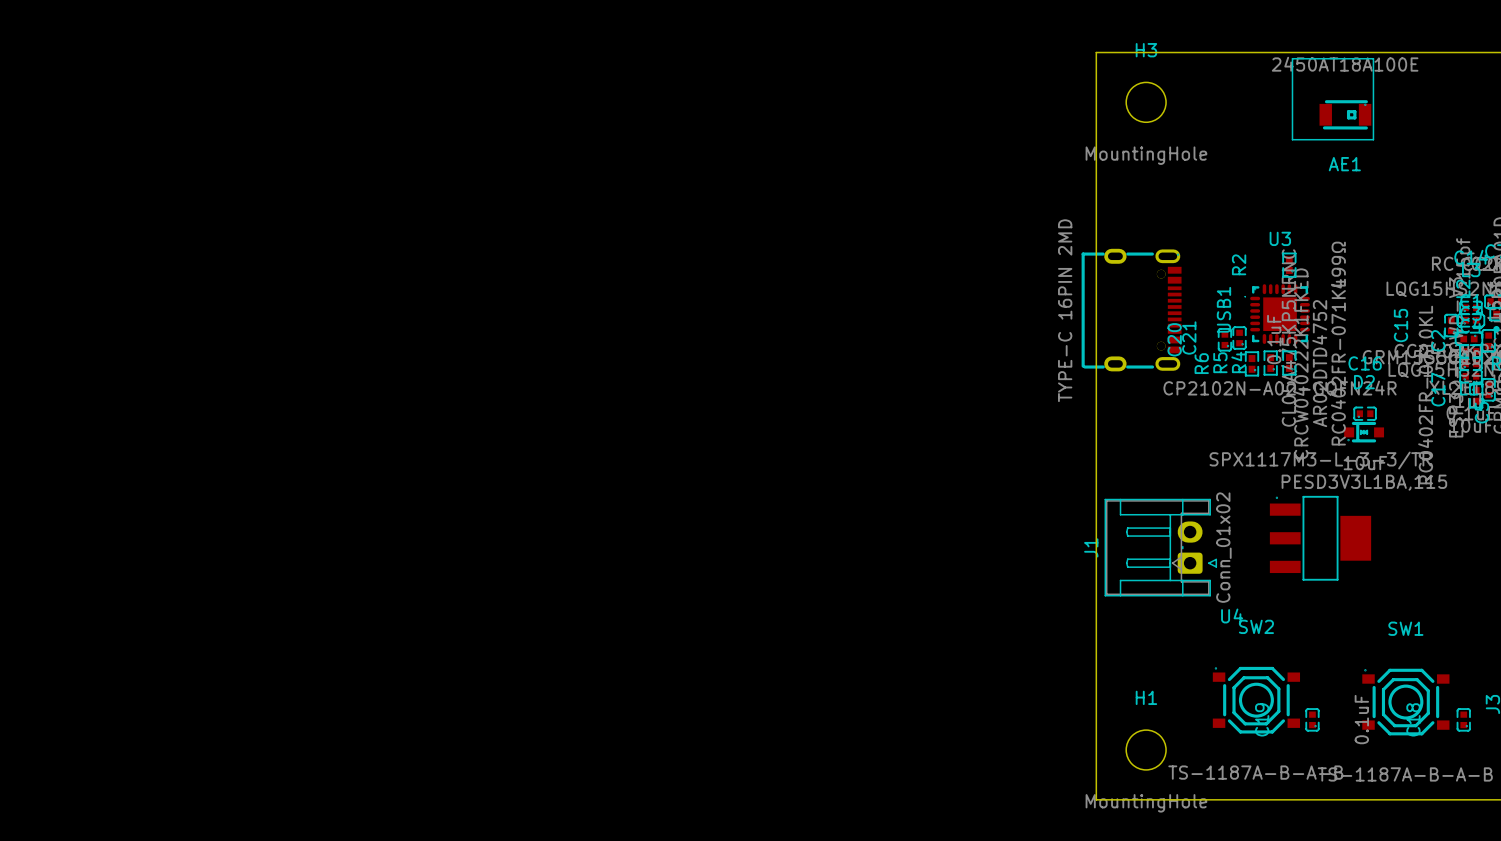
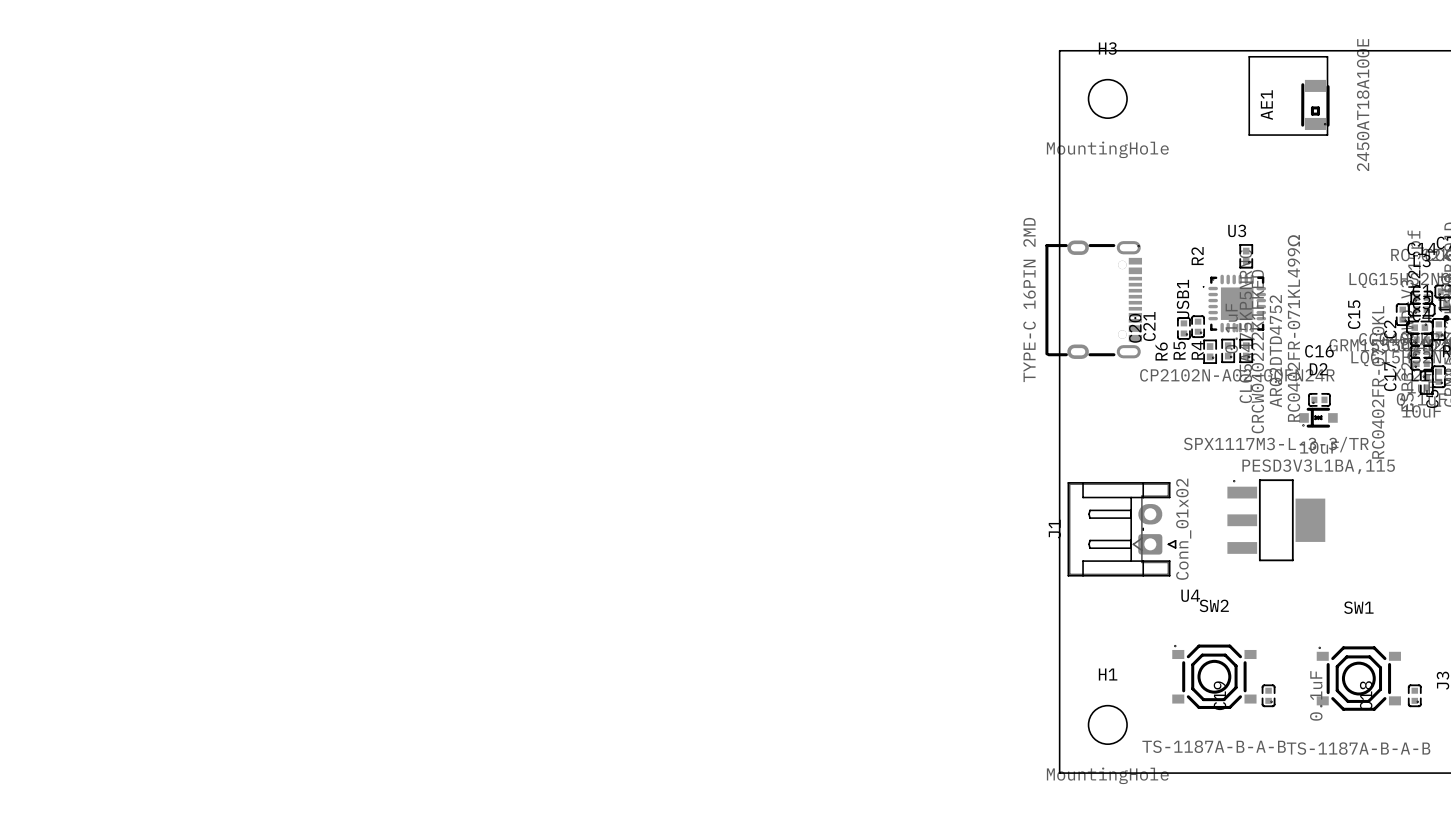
AE1 rotation: 0° (1345, 114) -> 90° clockwise (1315, 104)

